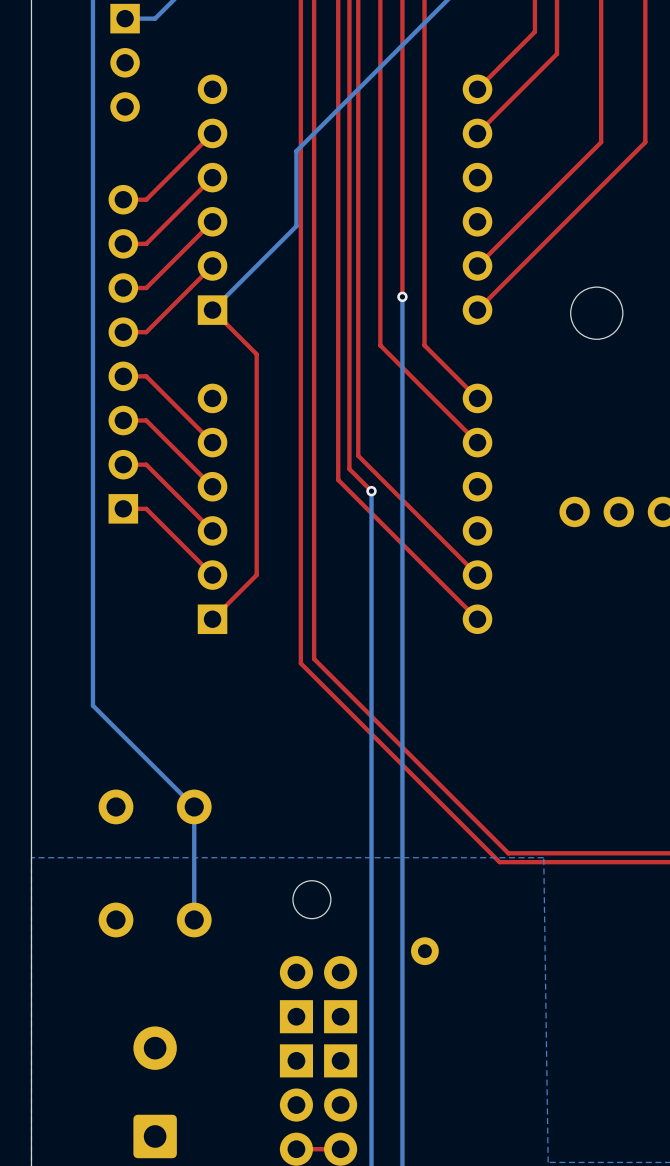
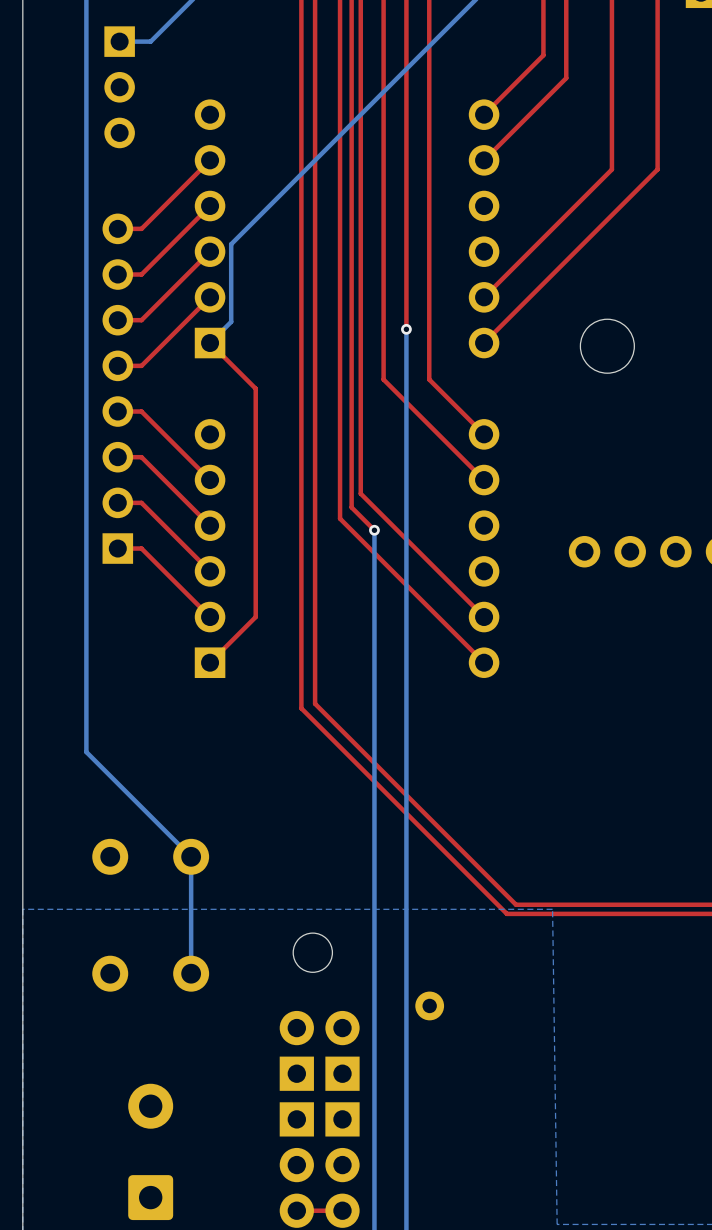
bottom track: (296, 151) (296, 226) (232, 289) -> (296, 178) (231, 244) (231, 321)

